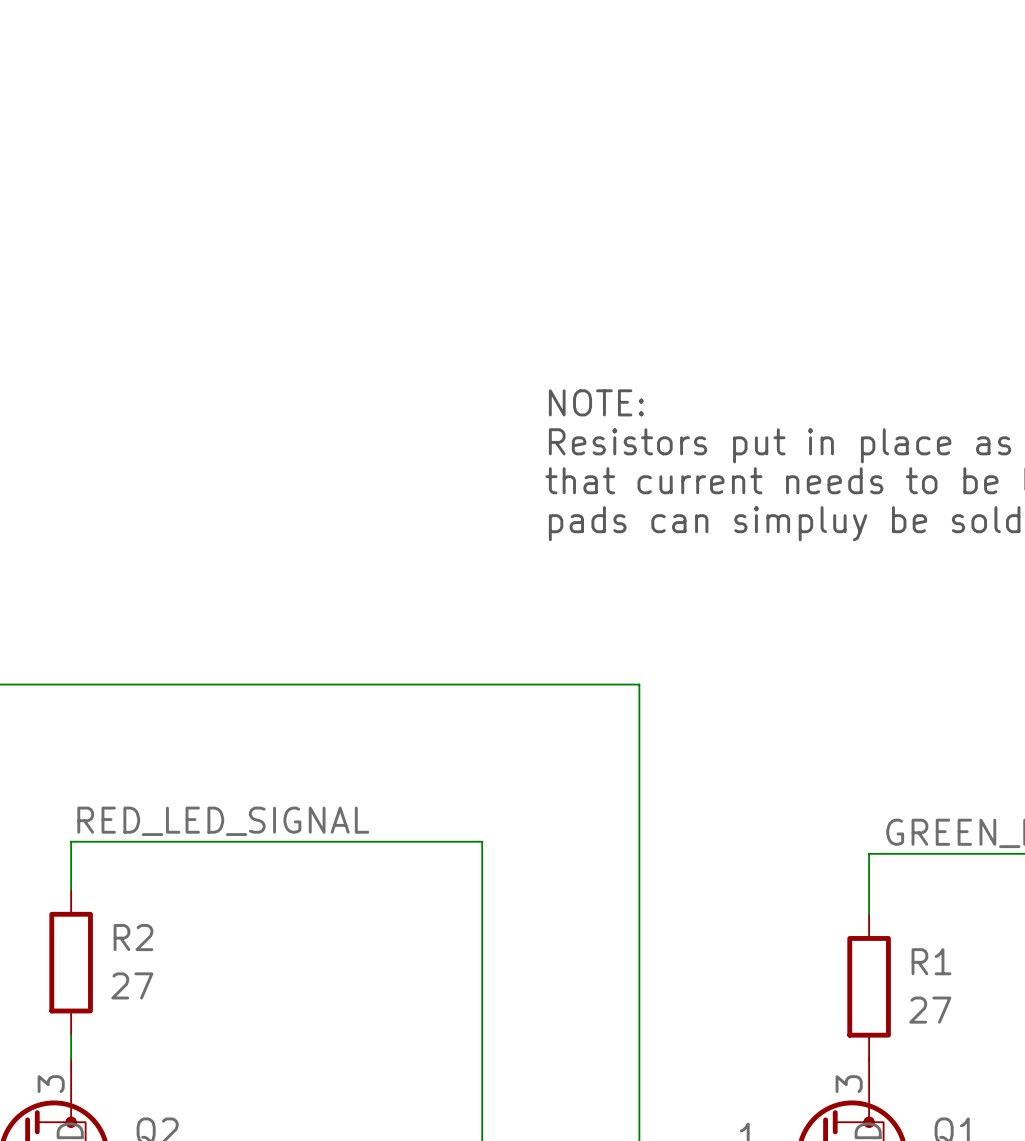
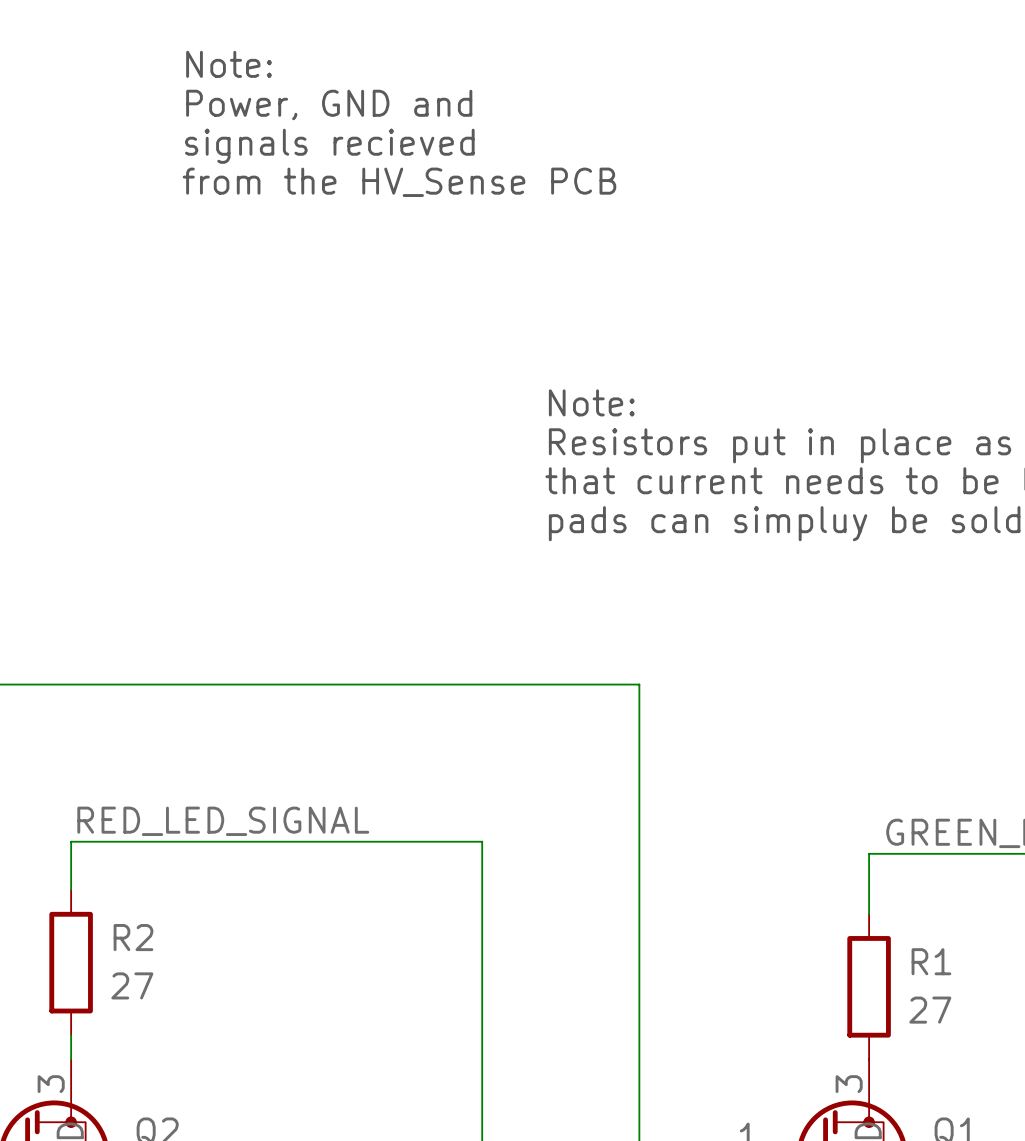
text: none -> Note: (229, 64)
text: none -> Power, GND and (329, 105)
text: none -> signals recieved (329, 146)
text: none -> from the HV_Sense PCB (399, 182)
text: NOTE: (596, 402) -> Note: (591, 402)

